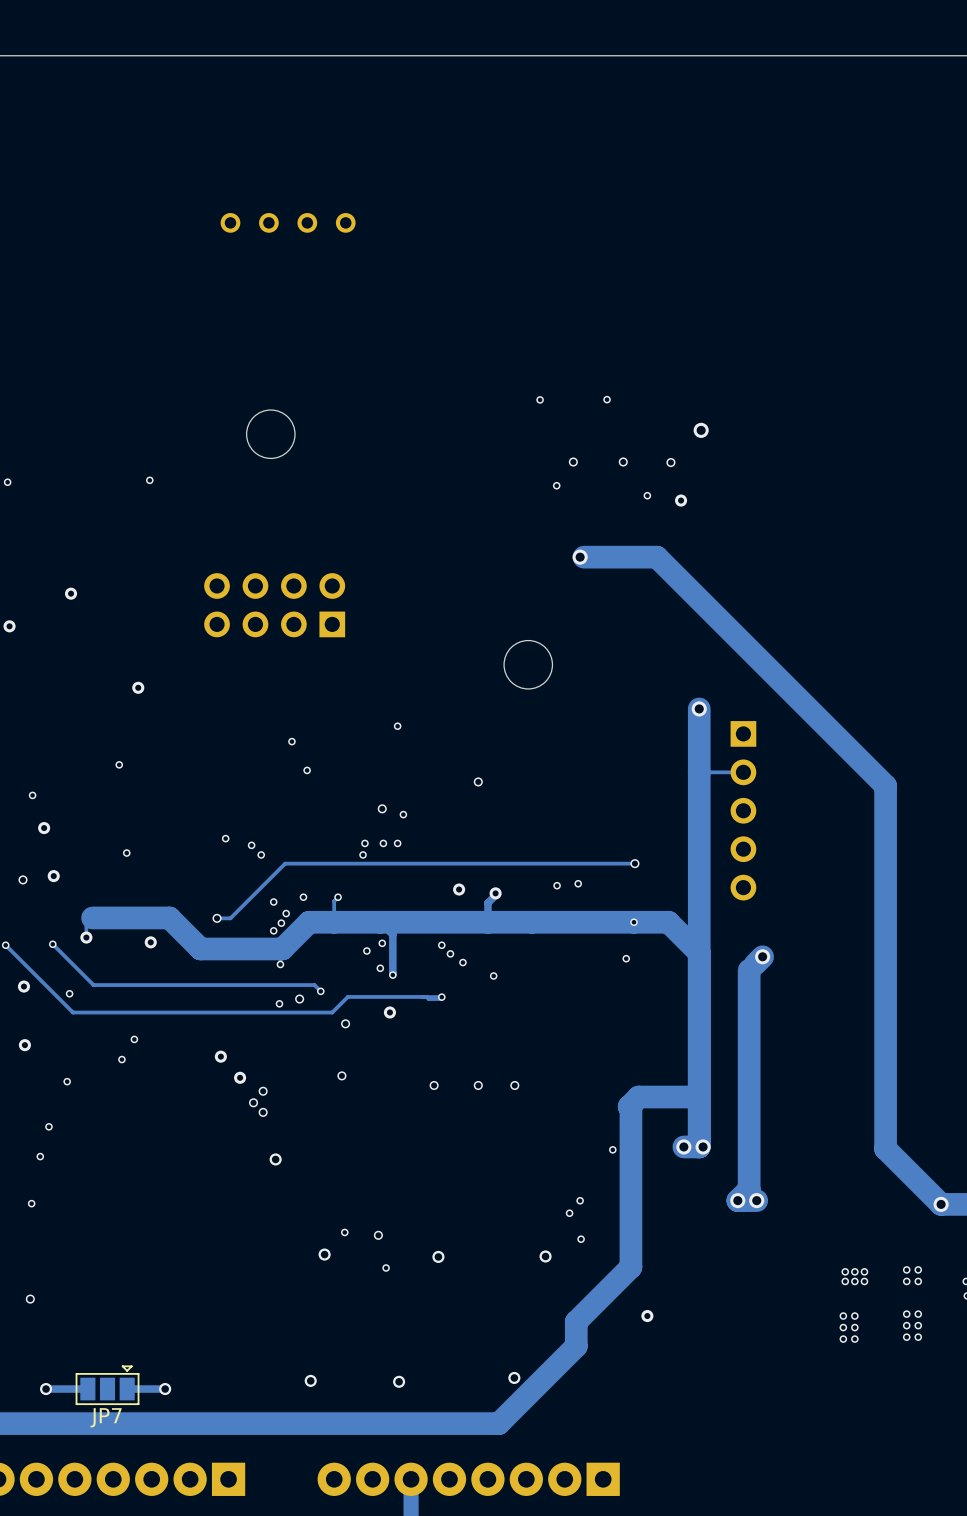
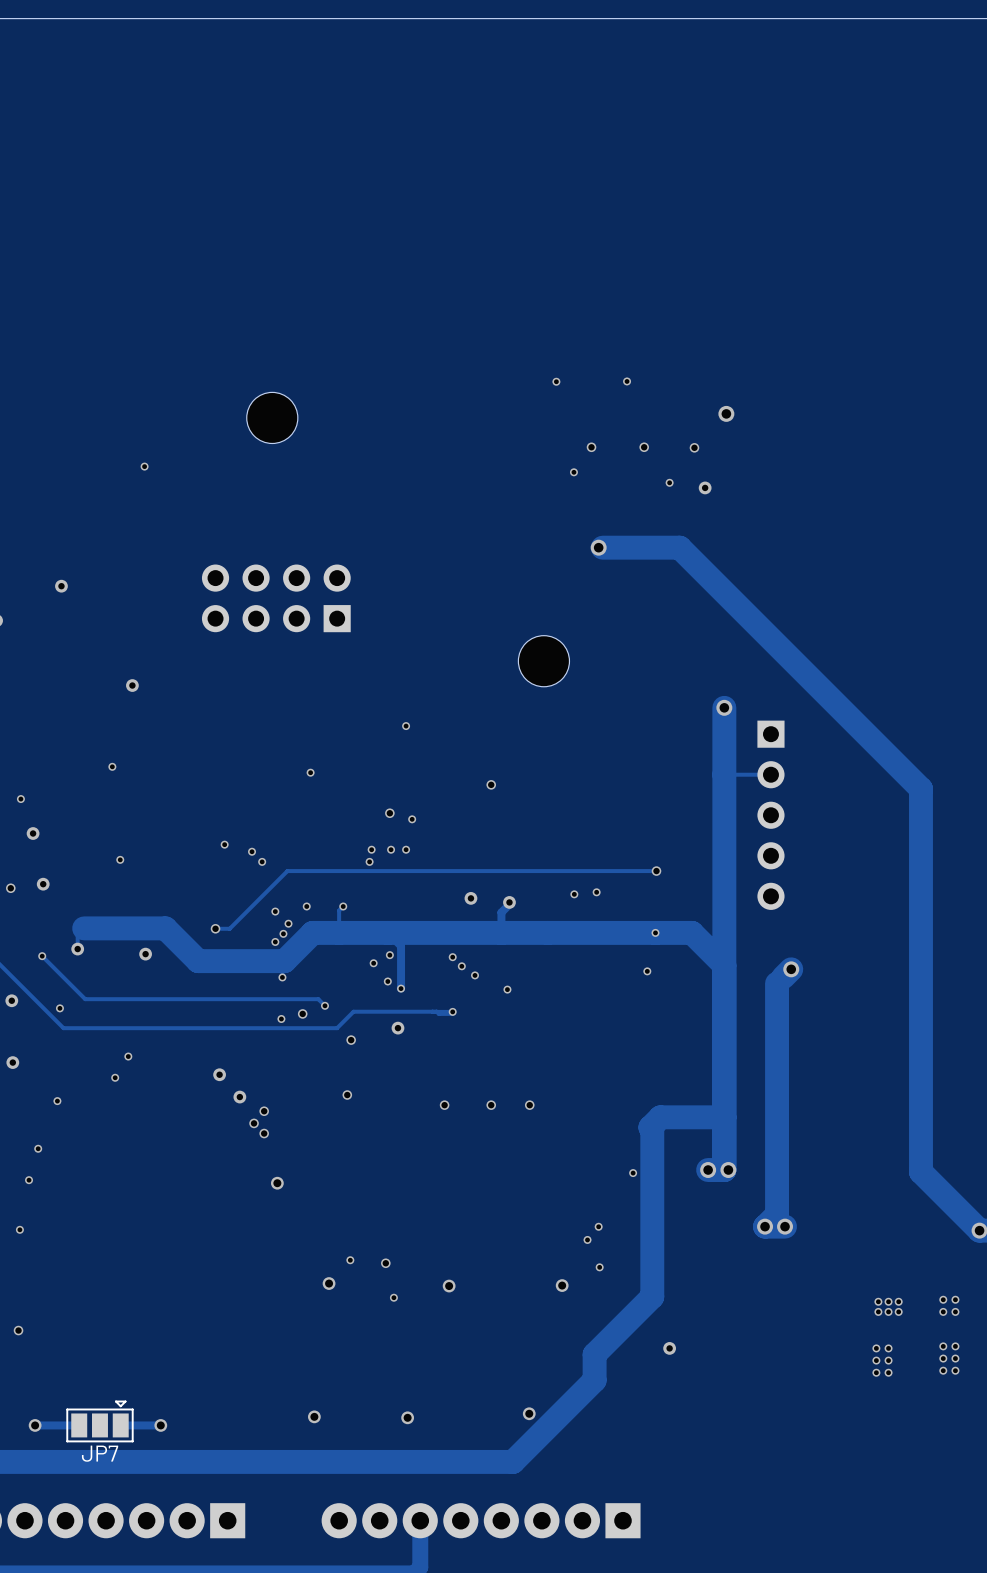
part: (288, 222) -> none
via: (291, 741) -> none

